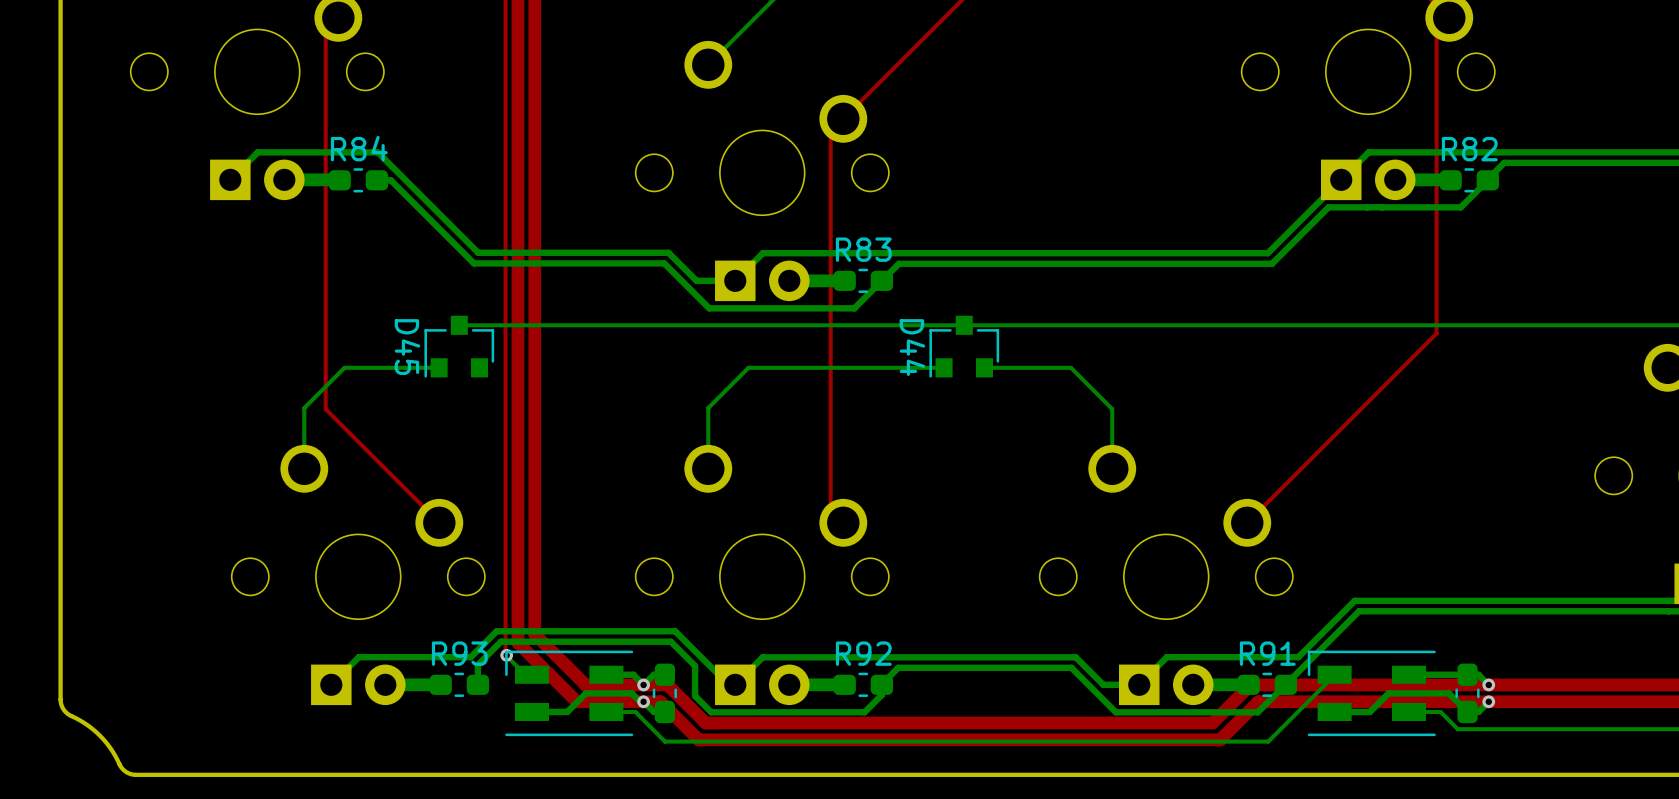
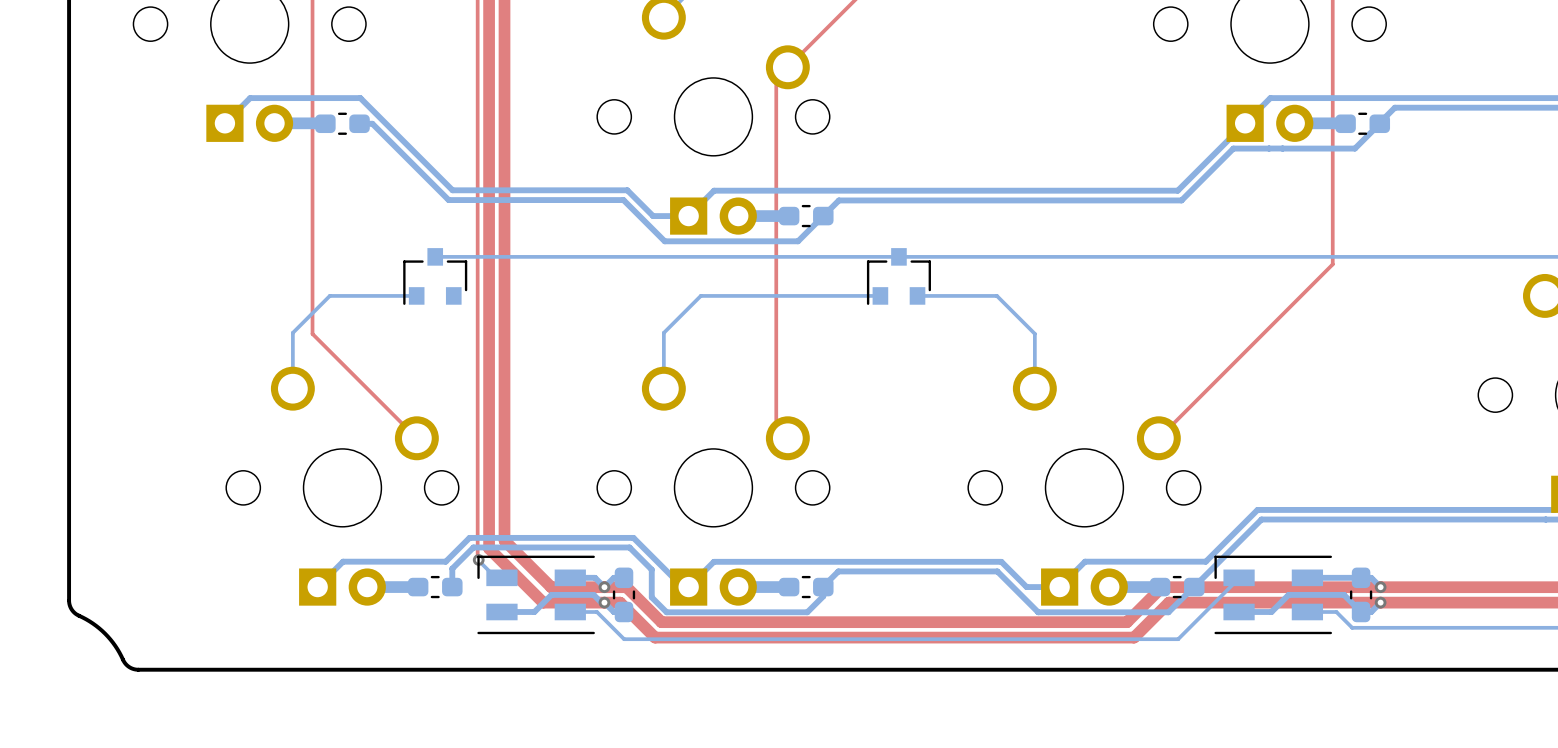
R84 name: R84 (359, 148) -> none
R82 name: R82 (1469, 149) -> none
R83 name: R83 (863, 249) -> none
D45 name: D45 (407, 347) -> none
D44 name: D44 (912, 347) -> none
R93 name: R93 (459, 653) -> none
R92 name: R92 (863, 653) -> none
R91 name: R91 (1267, 653) -> none

